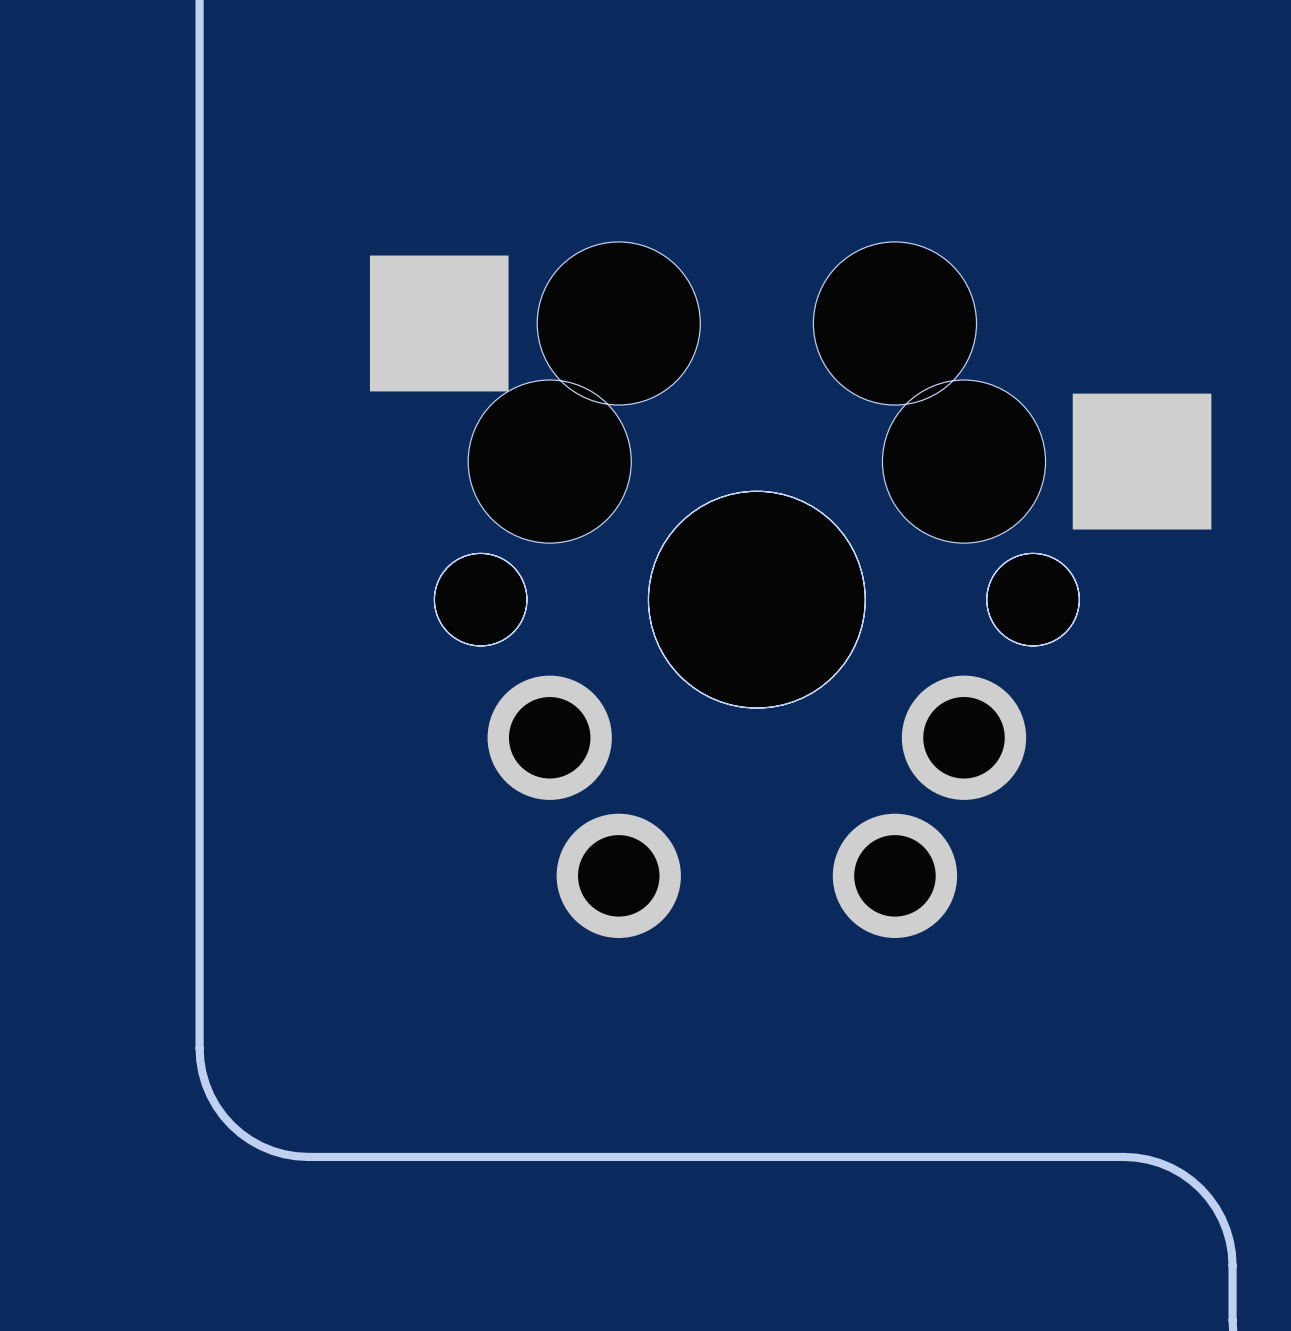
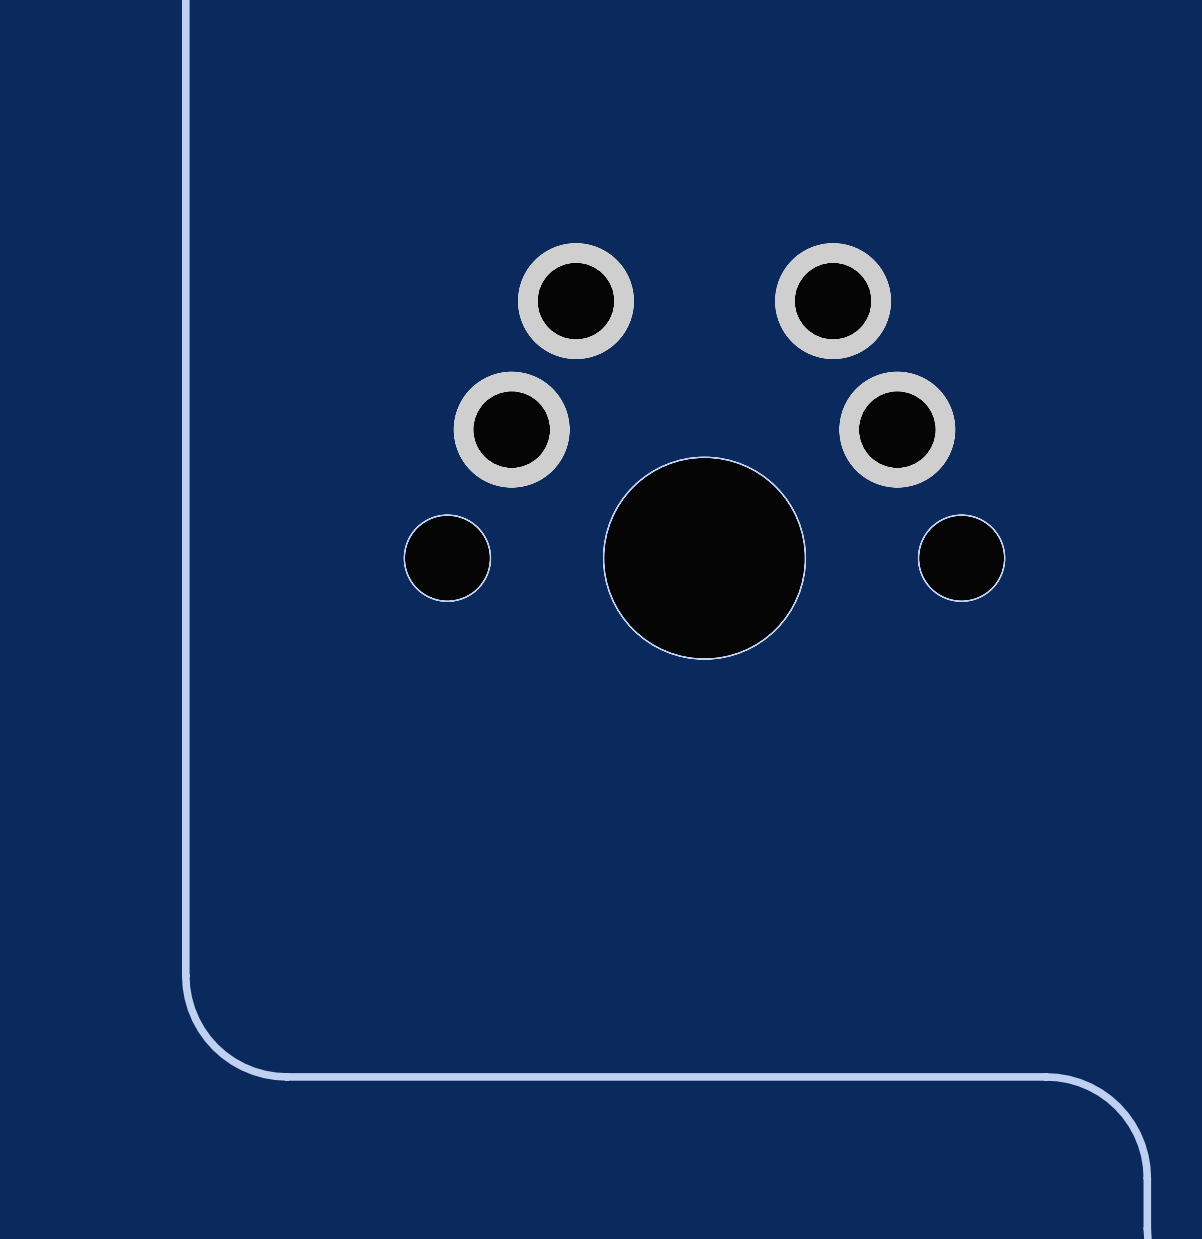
part footprint: [369, 241, 1212, 709] -> [404, 243, 1005, 660]
part: (756, 714) -> none

